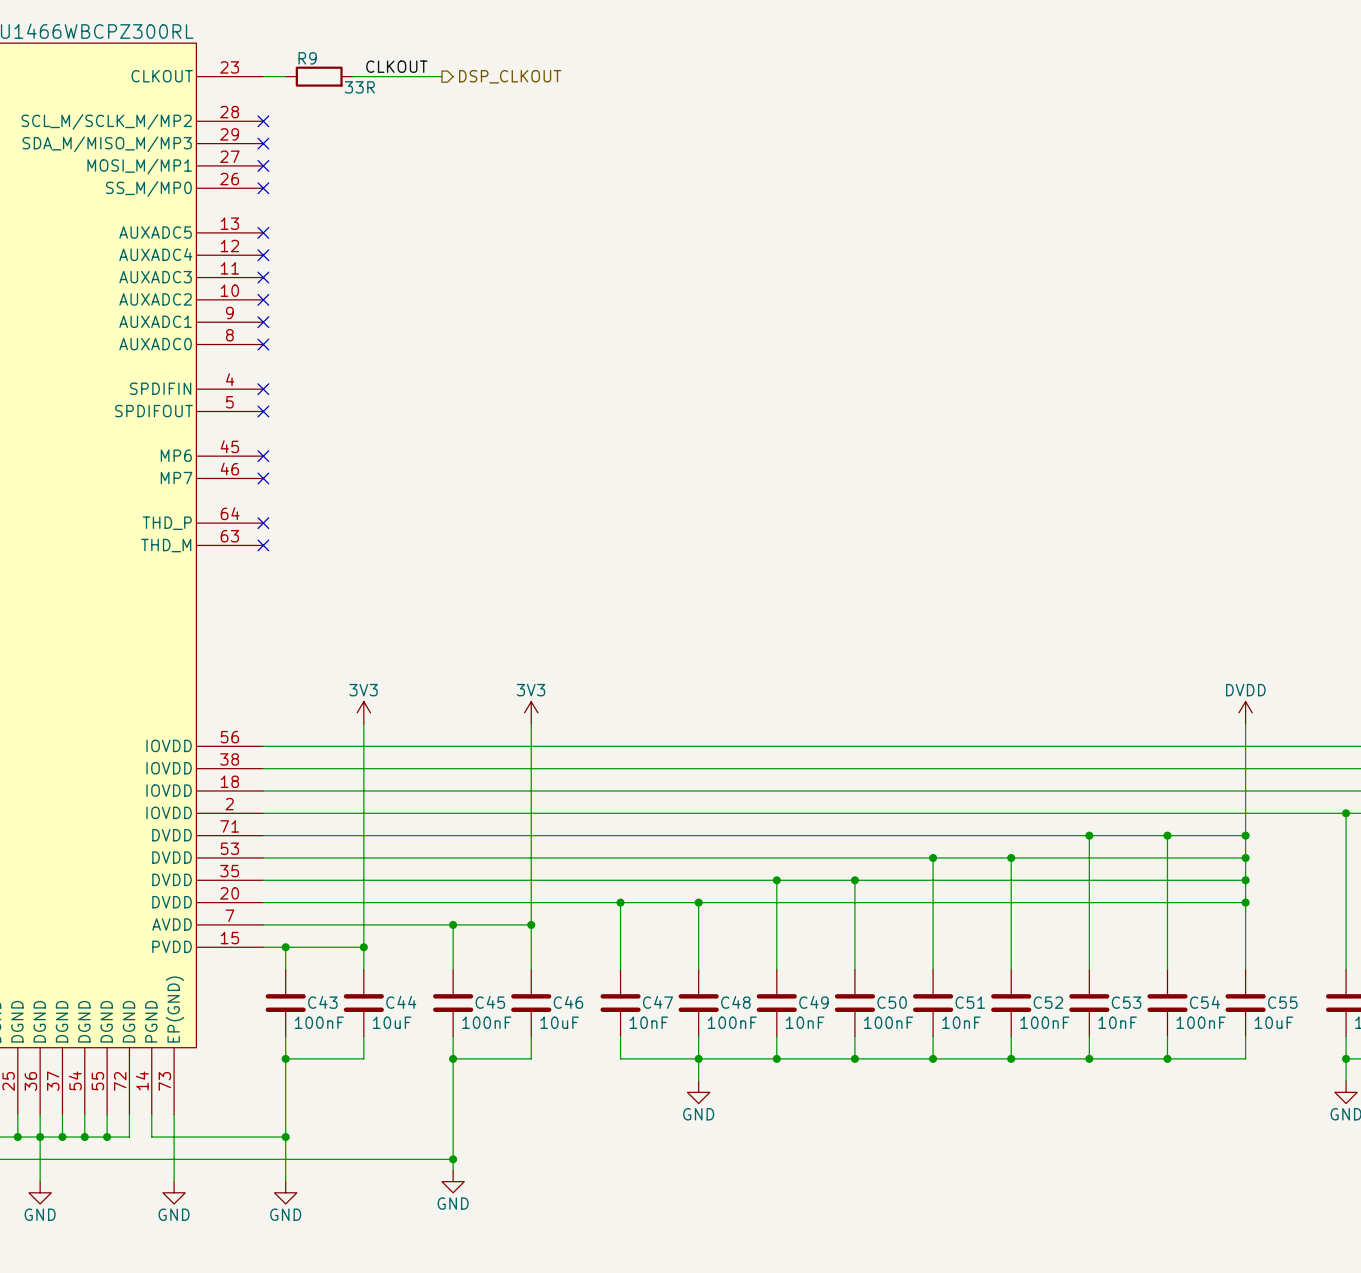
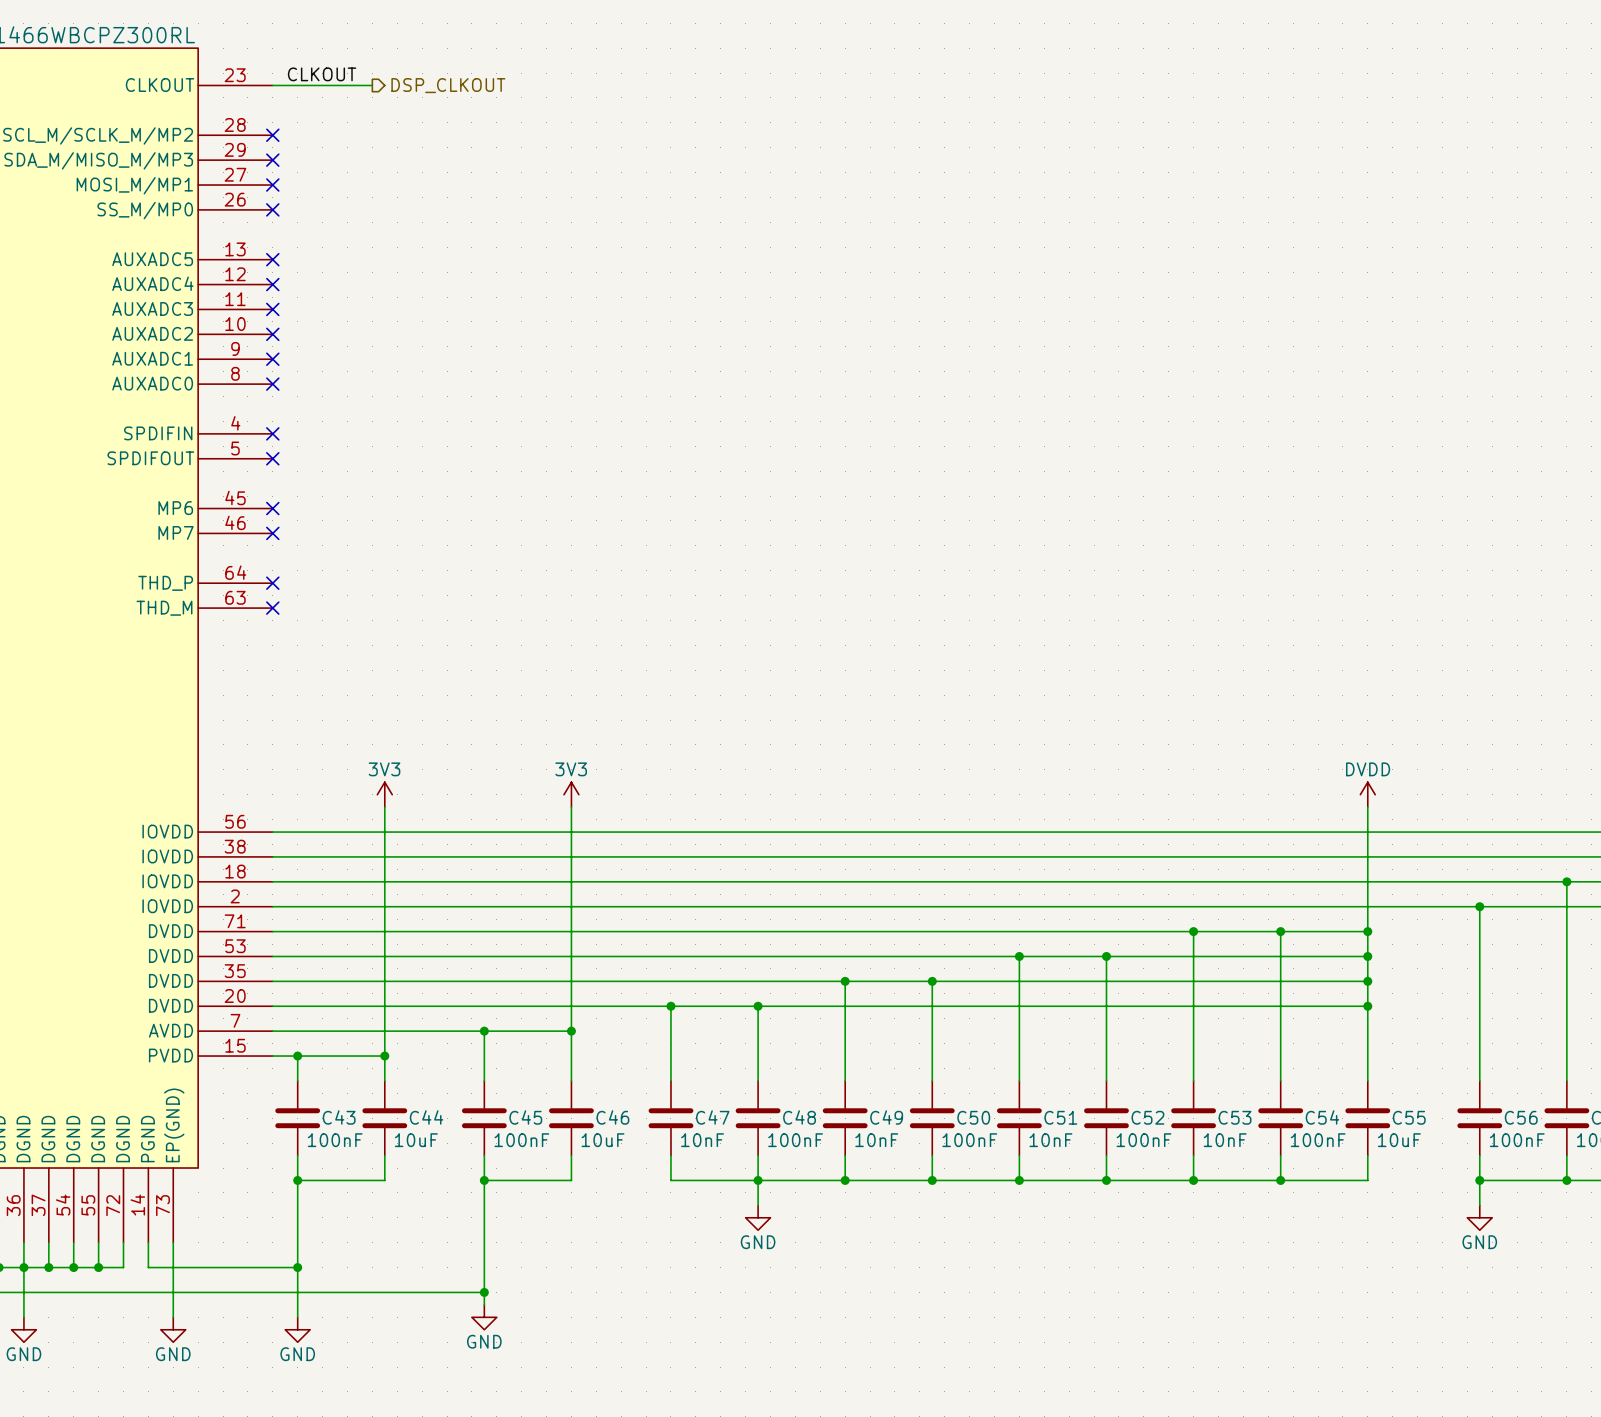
label position: CLKOUT (396, 66) -> CLKOUT (322, 74)
R9: 33R (319, 76) -> none
wire: (352, 76) (441, 76) -> (372, 85) (297, 85)
hierarchical label position: DSP_CLKOUT (510, 76) -> DSP_CLKOUT (448, 85)

